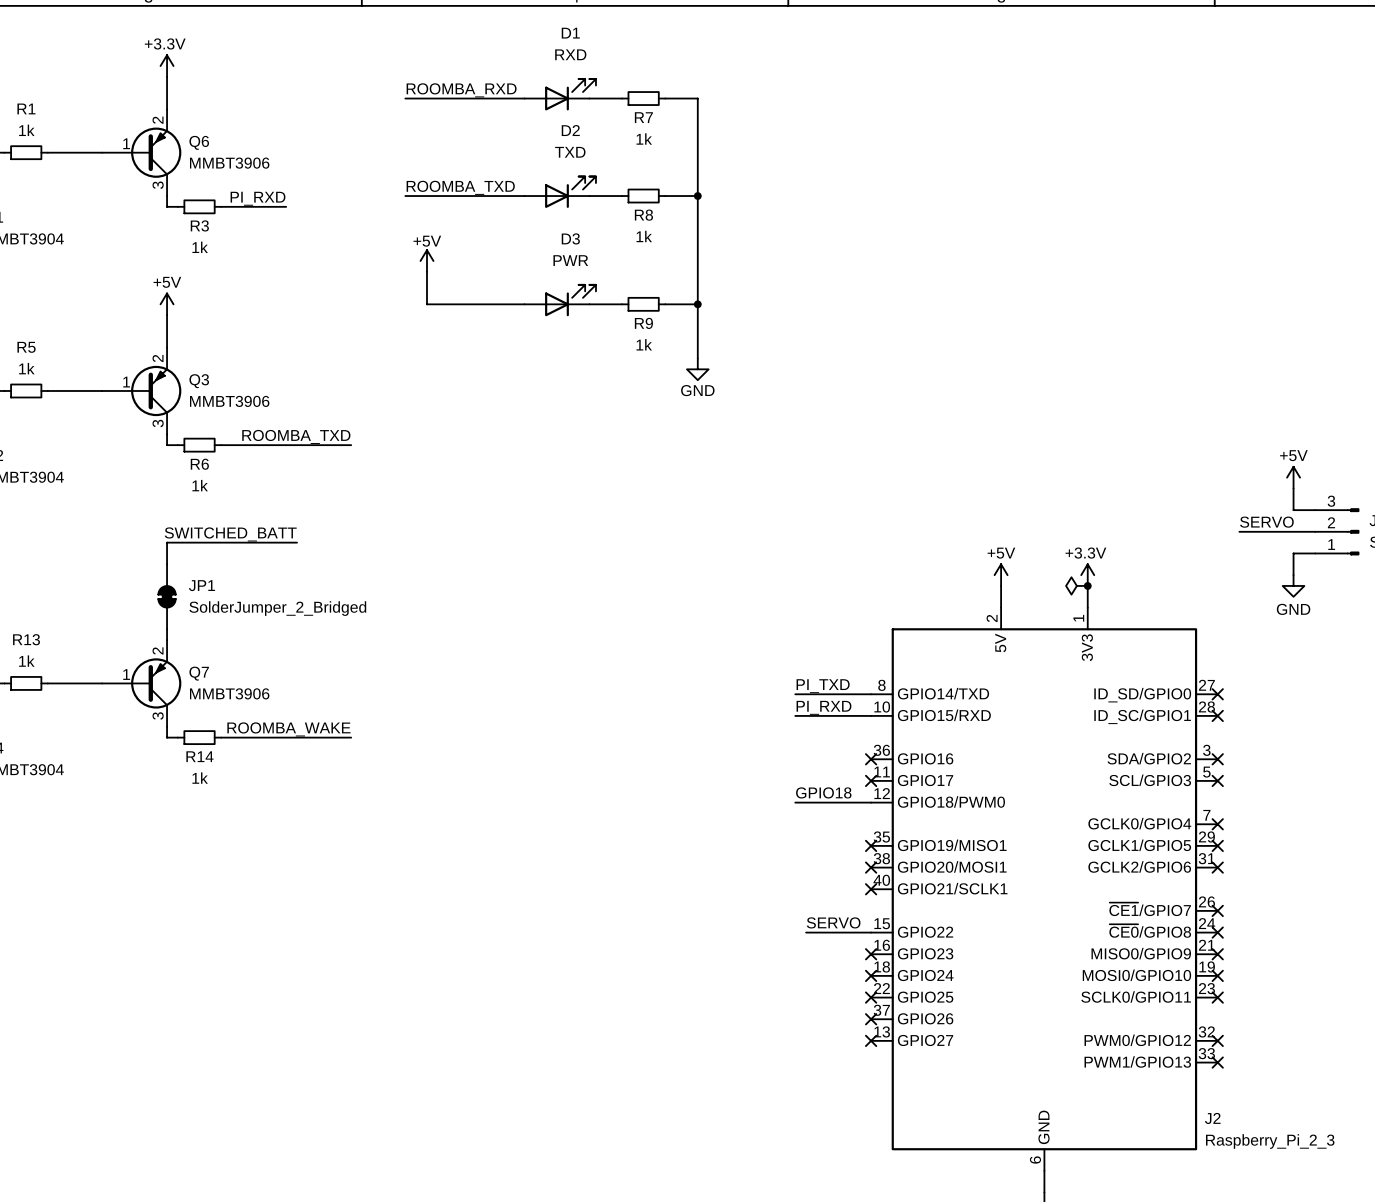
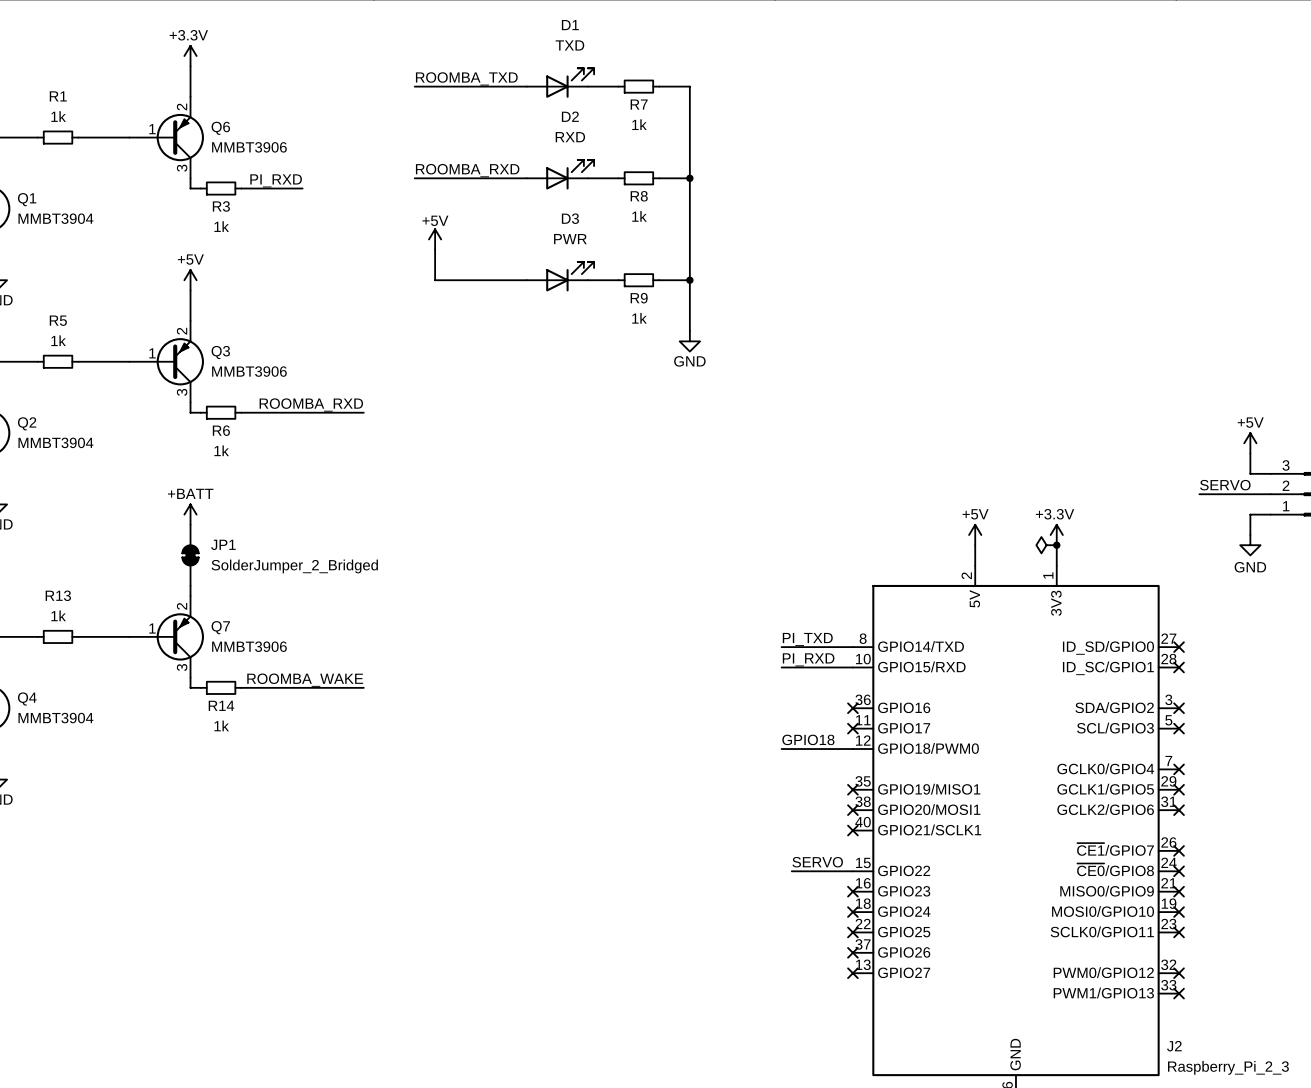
D1 value: RXD (570, 54) -> TXD (569, 45)
label: ROOMBA_RXD (461, 90) -> ROOMBA_TXD (466, 78)
D2 value: TXD (570, 152) -> RXD (570, 137)
label: ROOMBA_TXD (460, 187) -> ROOMBA_RXD (467, 170)
label: ROOMBA_TXD (296, 436) -> ROOMBA_RXD (311, 405)
label: SWITCHED_BATT (230, 534) -> none
wire: (297, 542) (167, 542) (167, 564) -> none
power symbol: none -> +BATT (190, 514)

